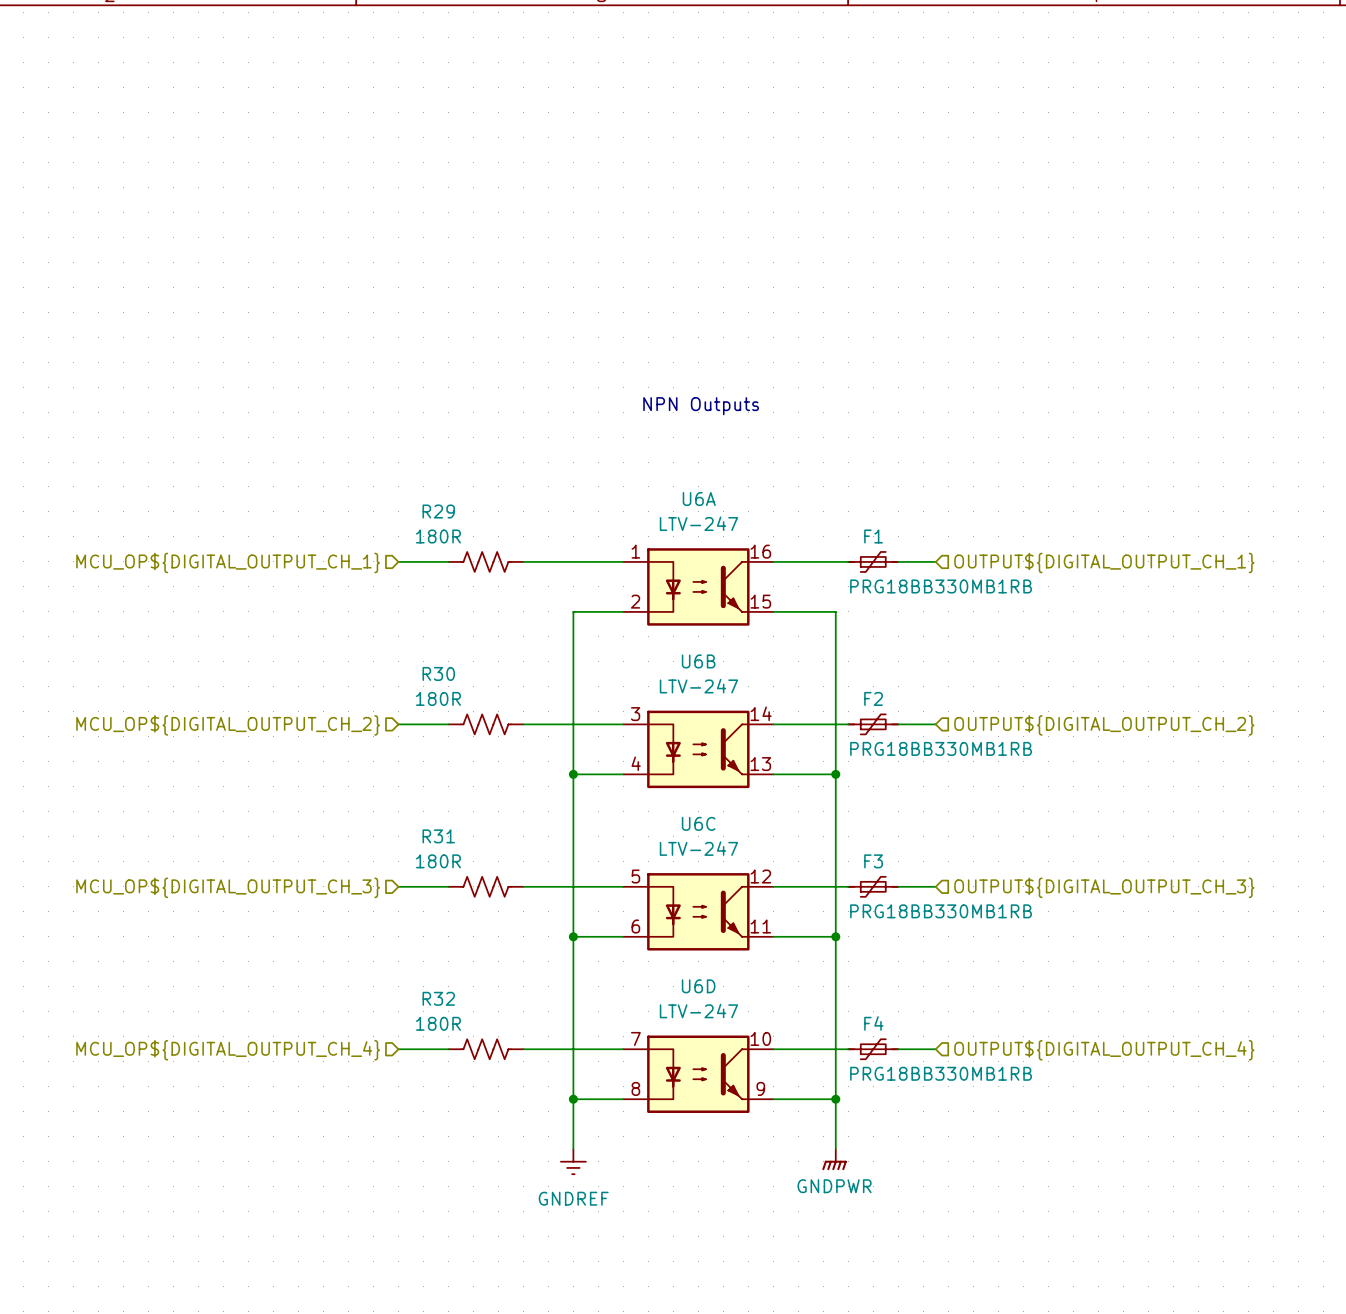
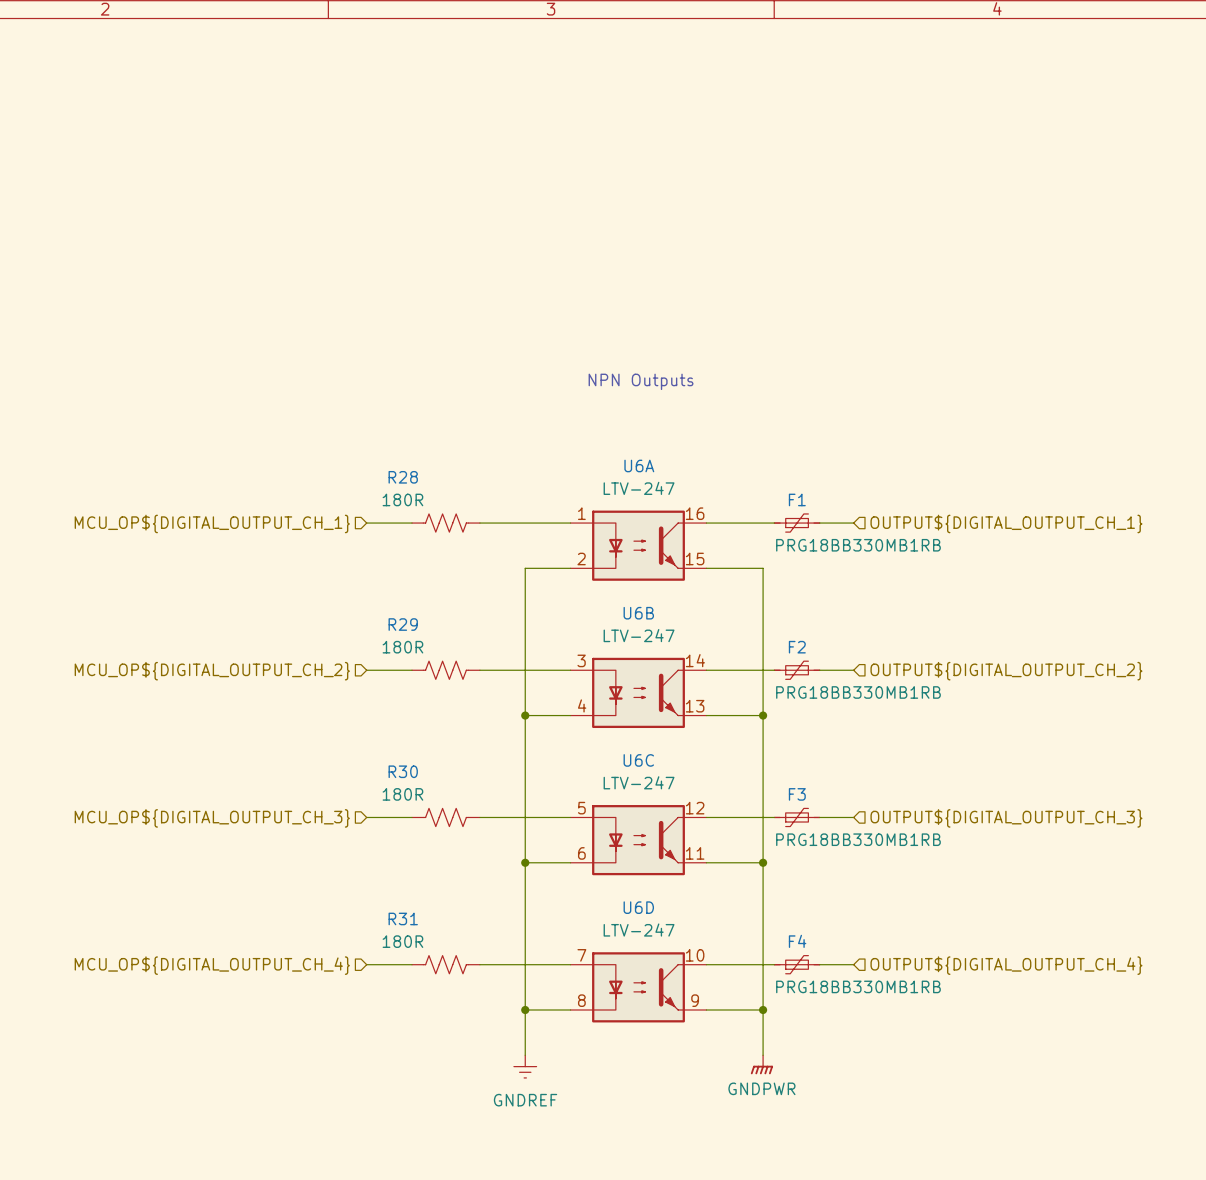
R29 name: R29 (438, 511) -> R28 (403, 477)
R30 name: R30 (438, 673) -> R29 (403, 624)
R31 name: R31 (438, 836) -> R30 (403, 771)
R32 name: R32 (438, 998) -> R31 (403, 918)

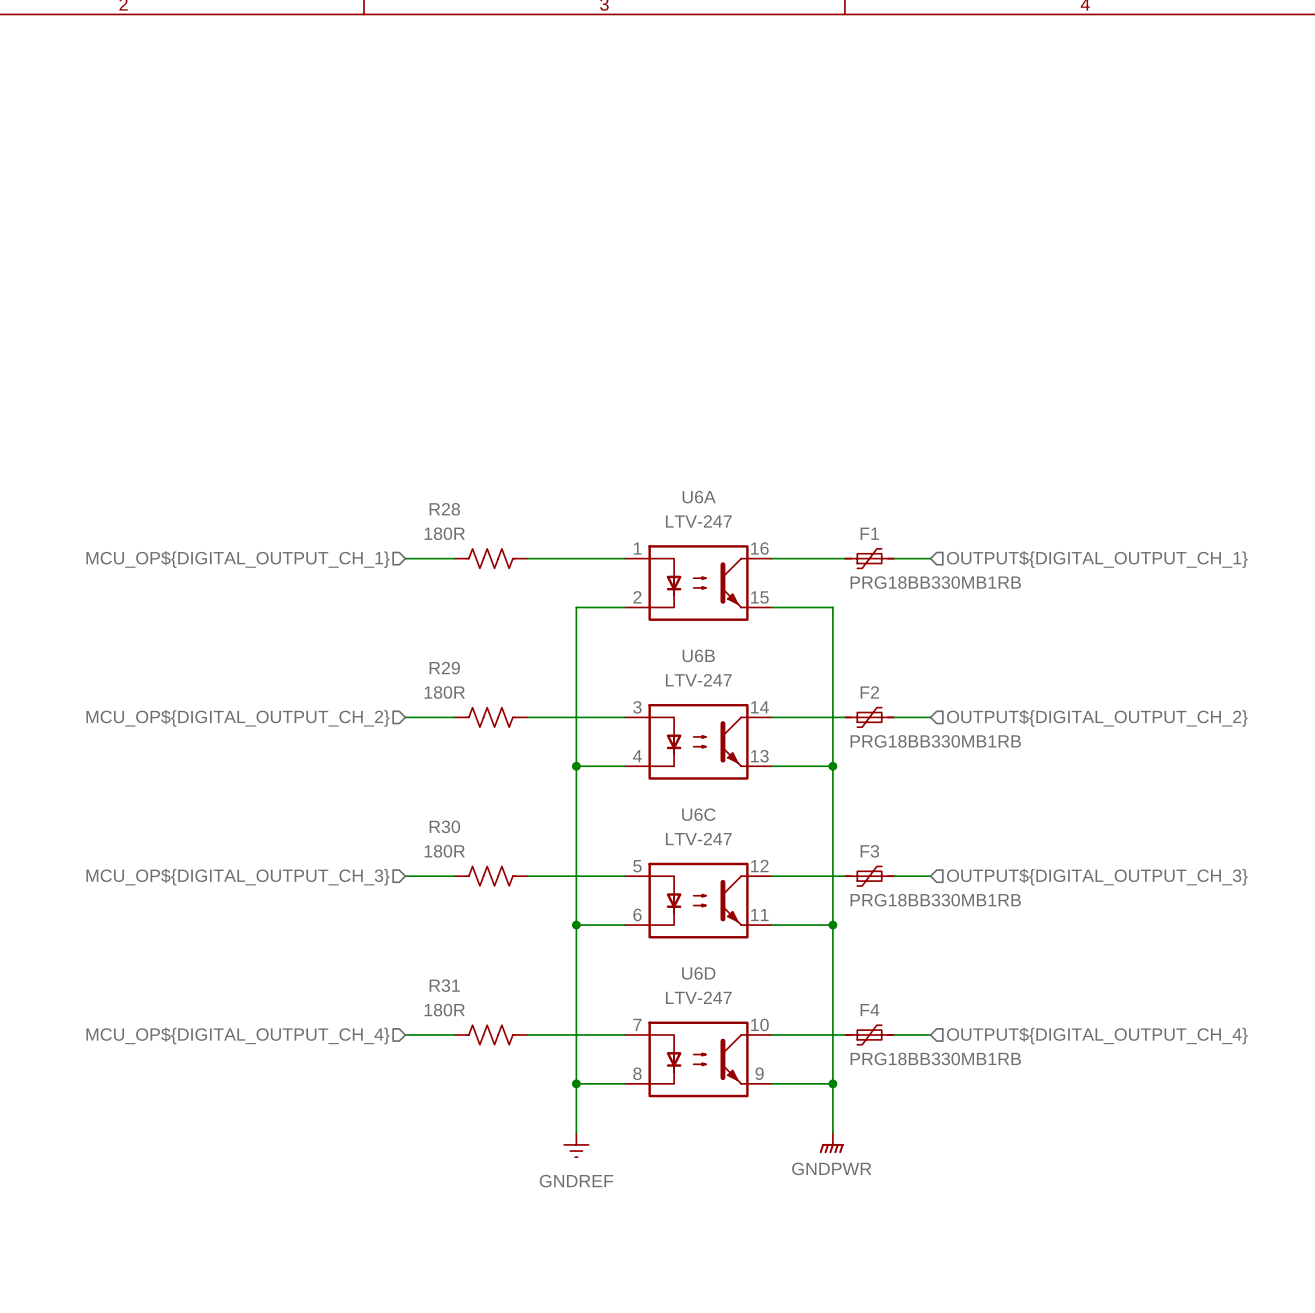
text: NPN Outputs (641, 381) -> none

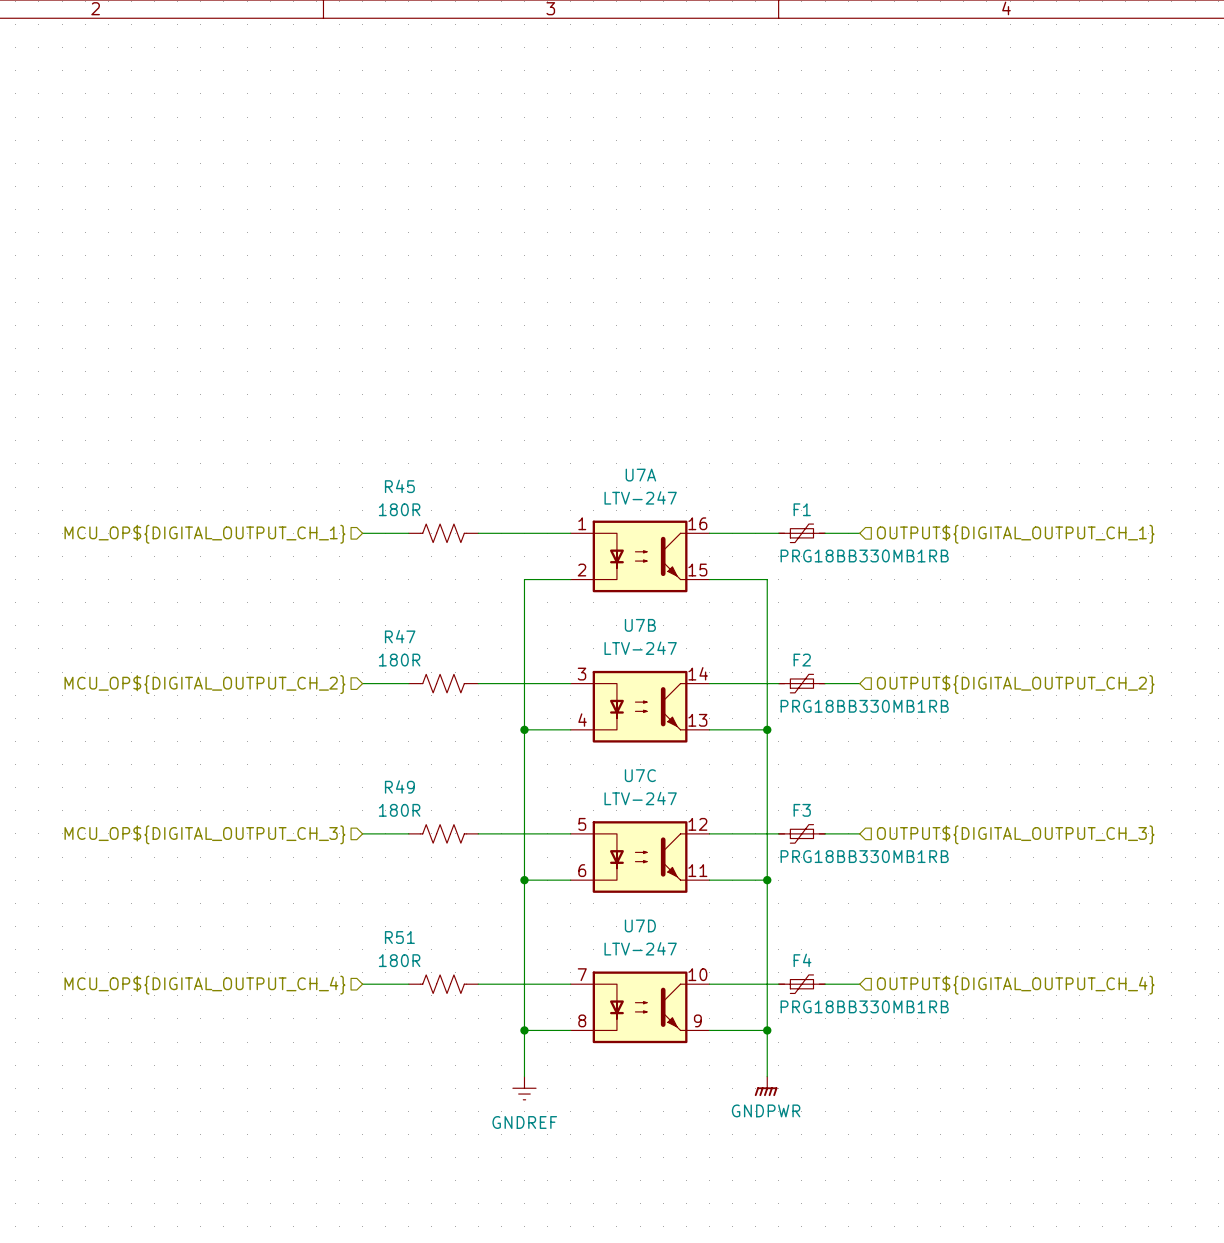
U6A name: U6A (699, 497) -> U7A (640, 475)
R28 name: R28 (444, 509) -> R45 (399, 486)
U6B name: U6B (698, 655) -> U7B (640, 625)
R29 name: R29 (444, 668) -> R47 (400, 636)
U6C name: U6C (698, 814) -> U7C (640, 775)
R30 name: R30 (444, 826) -> R49 (399, 786)
U6D name: U6D (698, 973) -> U7D (640, 925)
R31 name: R31 (444, 985) -> R51 (399, 937)

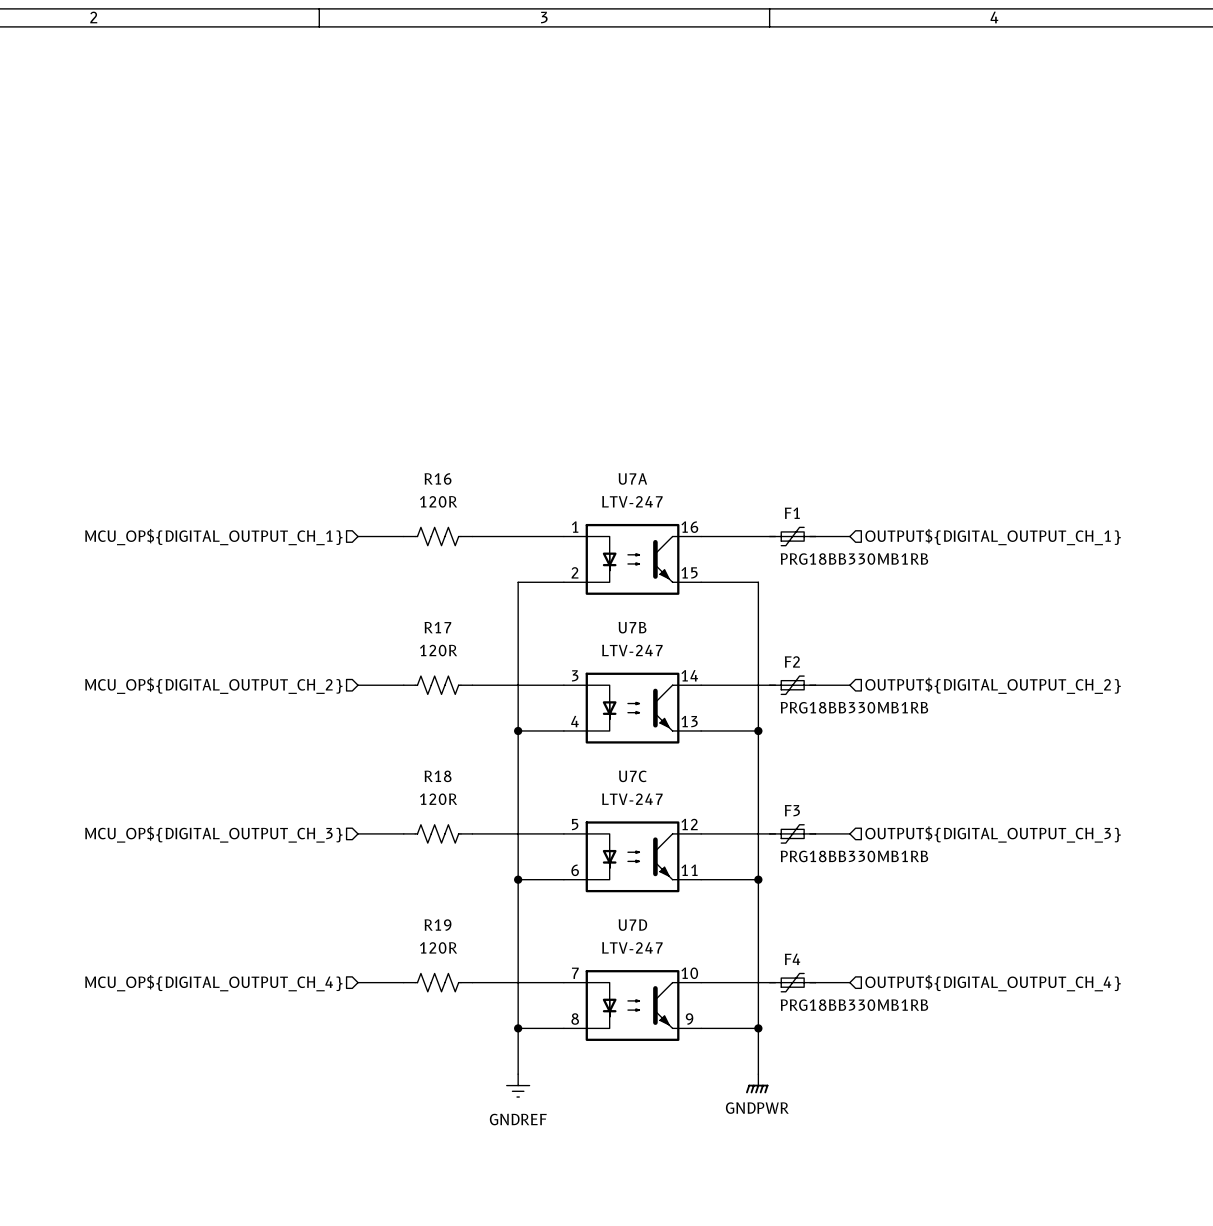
R45 name: R45 (399, 486) -> R16 (438, 478)
R45 value: 180R (399, 509) -> 120R (438, 501)
R47 name: R47 (400, 636) -> R17 (437, 627)
R47 value: 180R (399, 660) -> 120R (438, 650)
R49 name: R49 (399, 786) -> R18 (438, 776)
R49 value: 180R (399, 810) -> 120R (438, 799)
R51 name: R51 (399, 937) -> R19 (438, 925)
R51 value: 180R (399, 960) -> 120R (438, 947)

